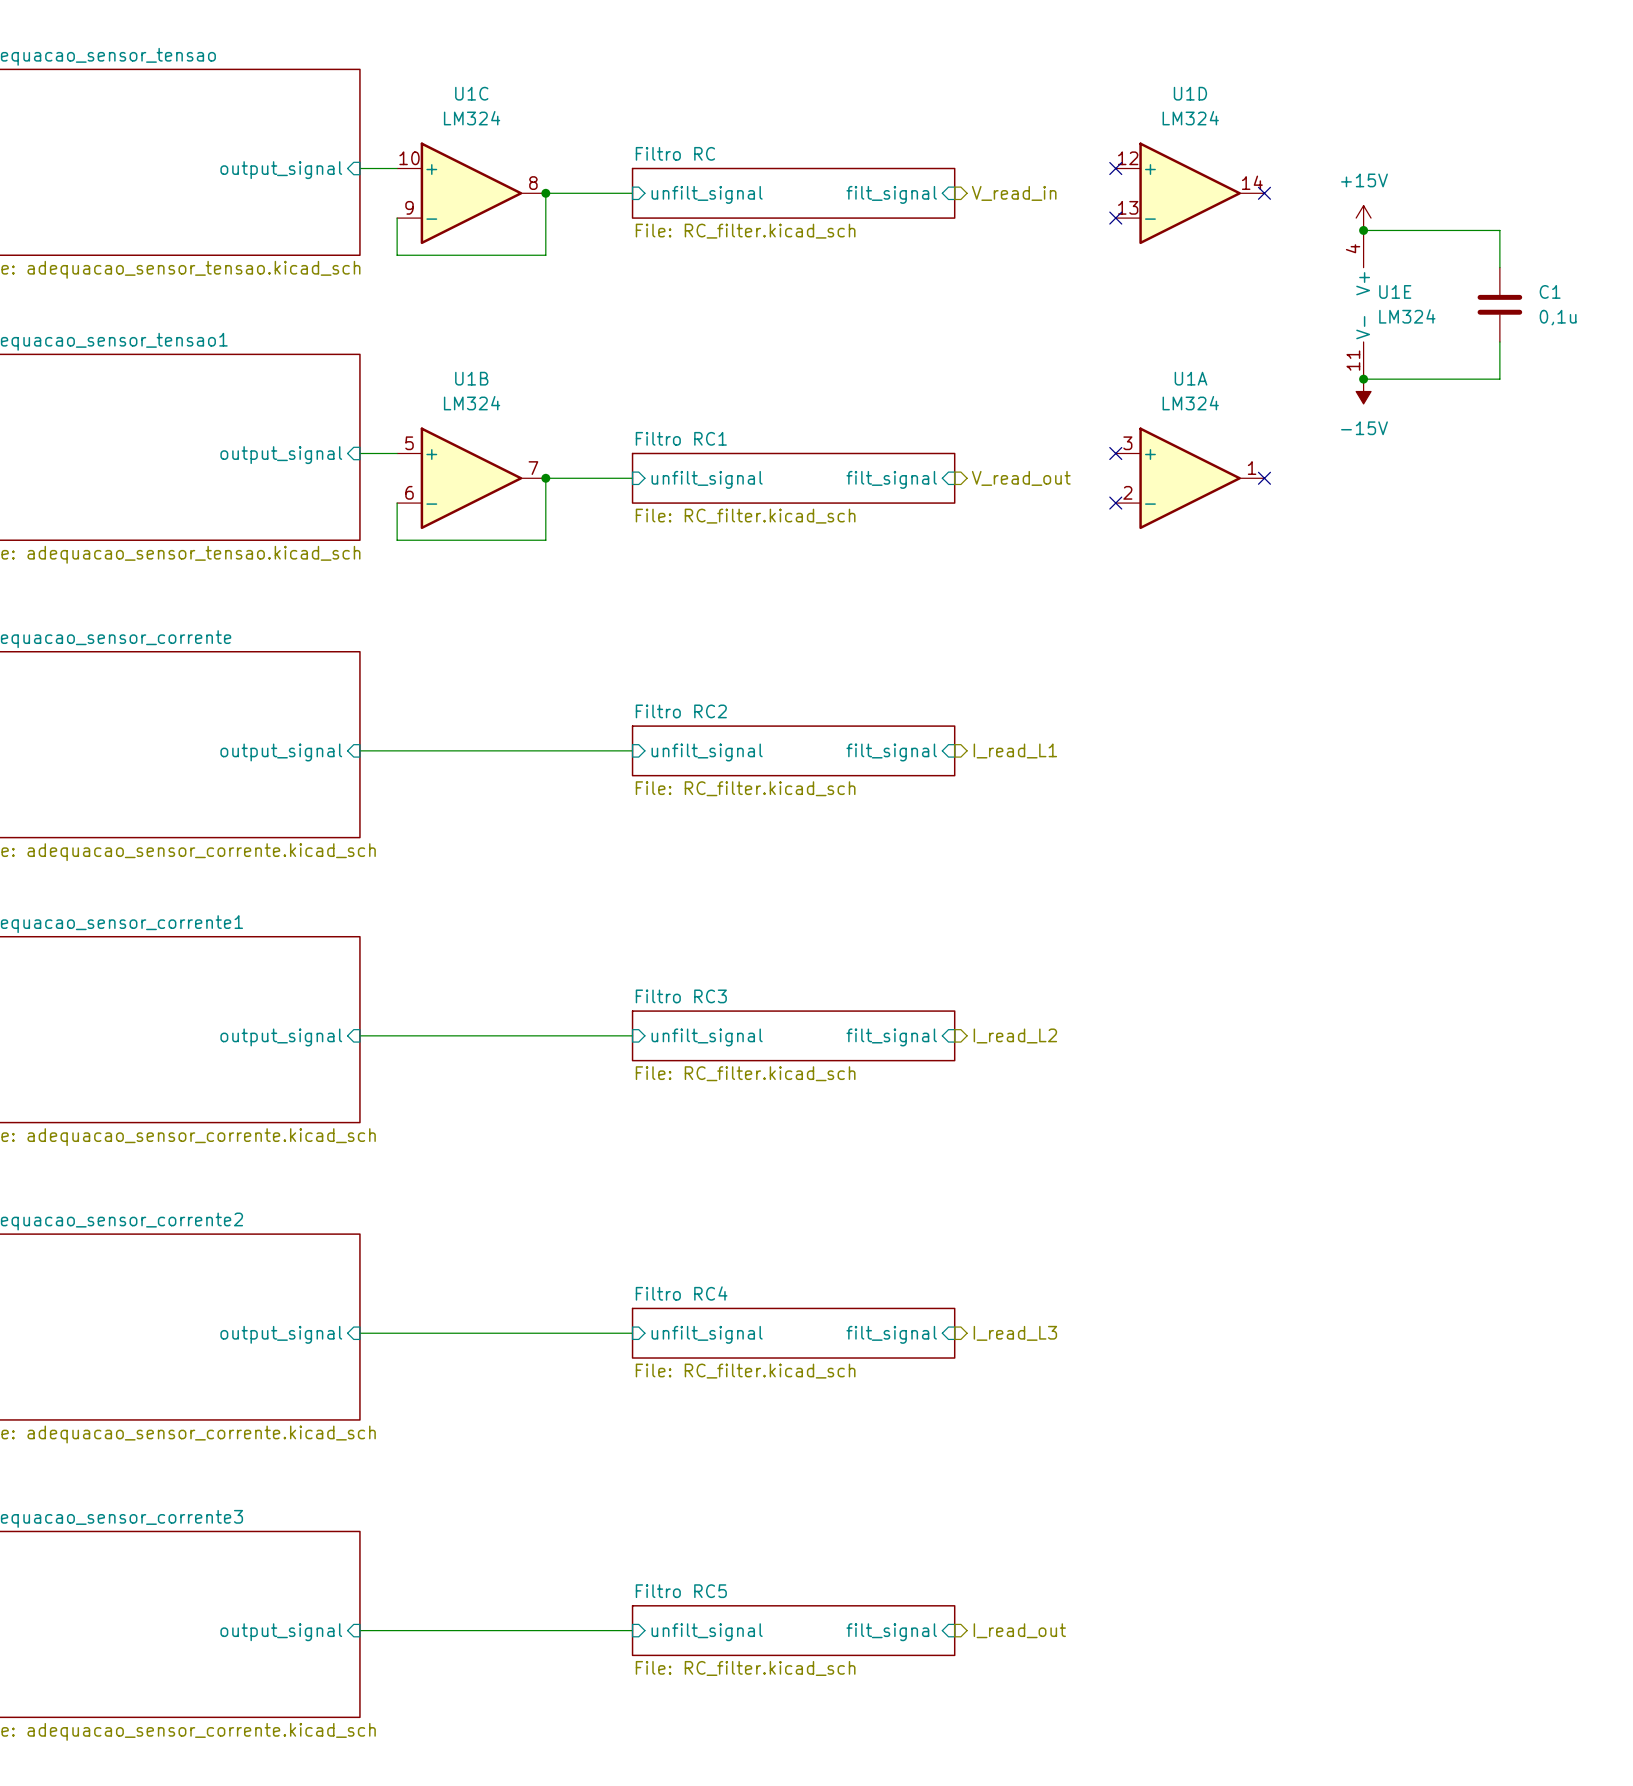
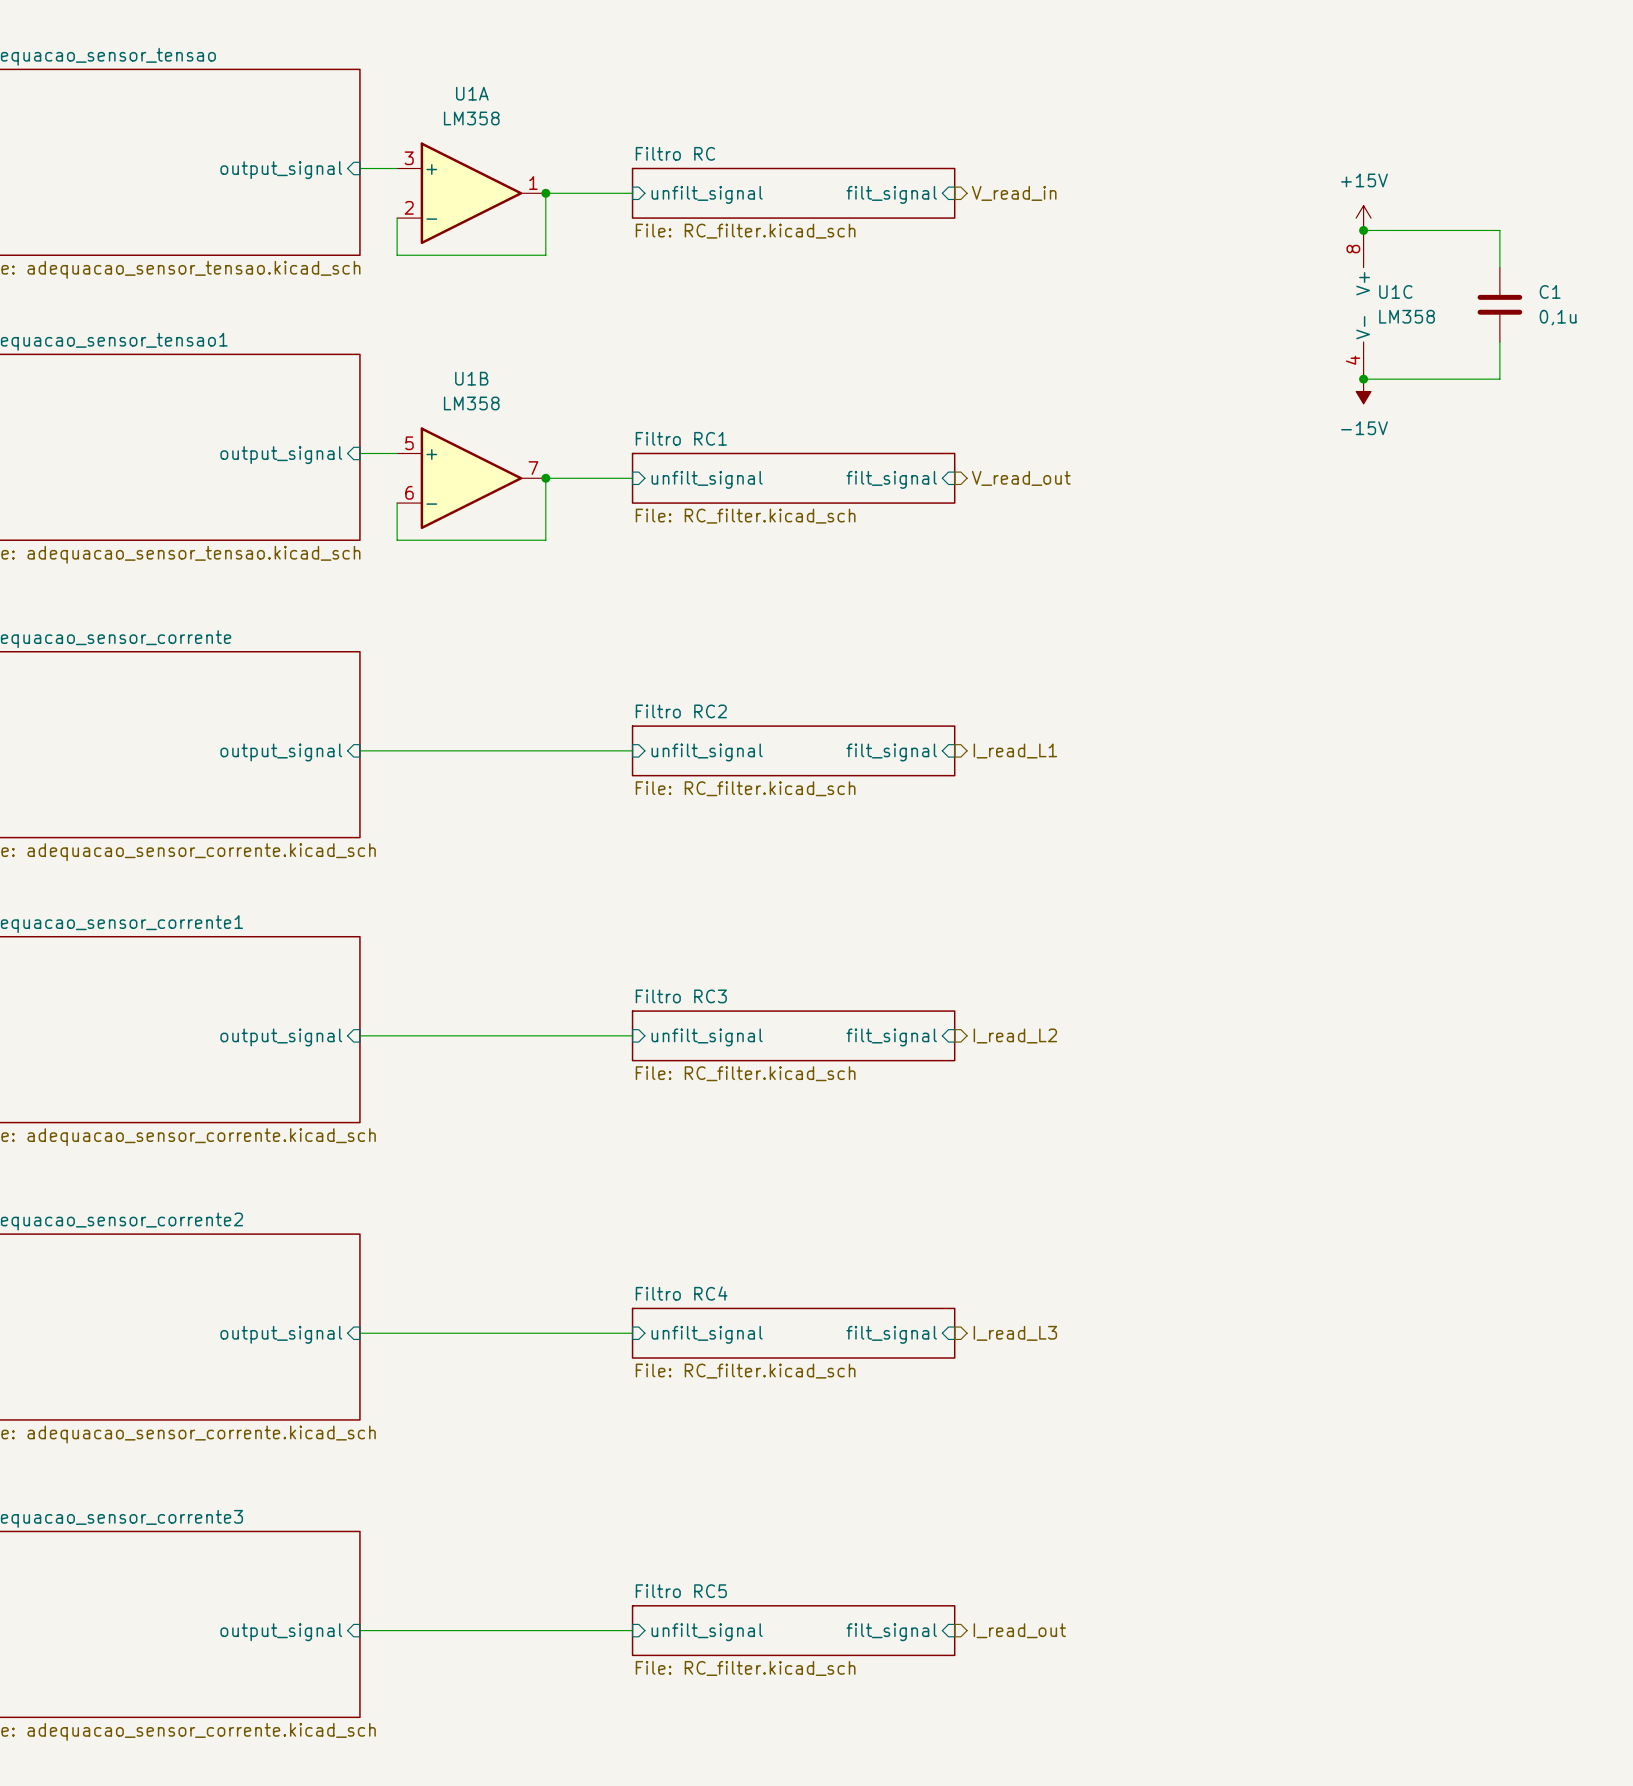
U1C name position: U1C (471, 93) -> U1C (1395, 291)
U1C value: LM324 (472, 118) -> LM358 (1407, 316)
U1C symbol: [397, 142, 546, 245] -> [1363, 230, 1364, 380]
no-connect mark: (1115, 168) -> none
U1D: LM324 (1190, 193) -> none
no-connect mark: (1264, 193) -> none
no-connect mark: (1115, 218) -> none
U1E: LM324 (1363, 304) -> none
U1B value: LM324 (472, 403) -> LM358 (471, 403)
U1A value: LM324 (1190, 403) -> LM358 (471, 118)
no-connect mark: (1115, 453) -> none
U1A position: (1190, 478) -> (471, 193)
no-connect mark: (1264, 478) -> none
no-connect mark: (1115, 503) -> none

